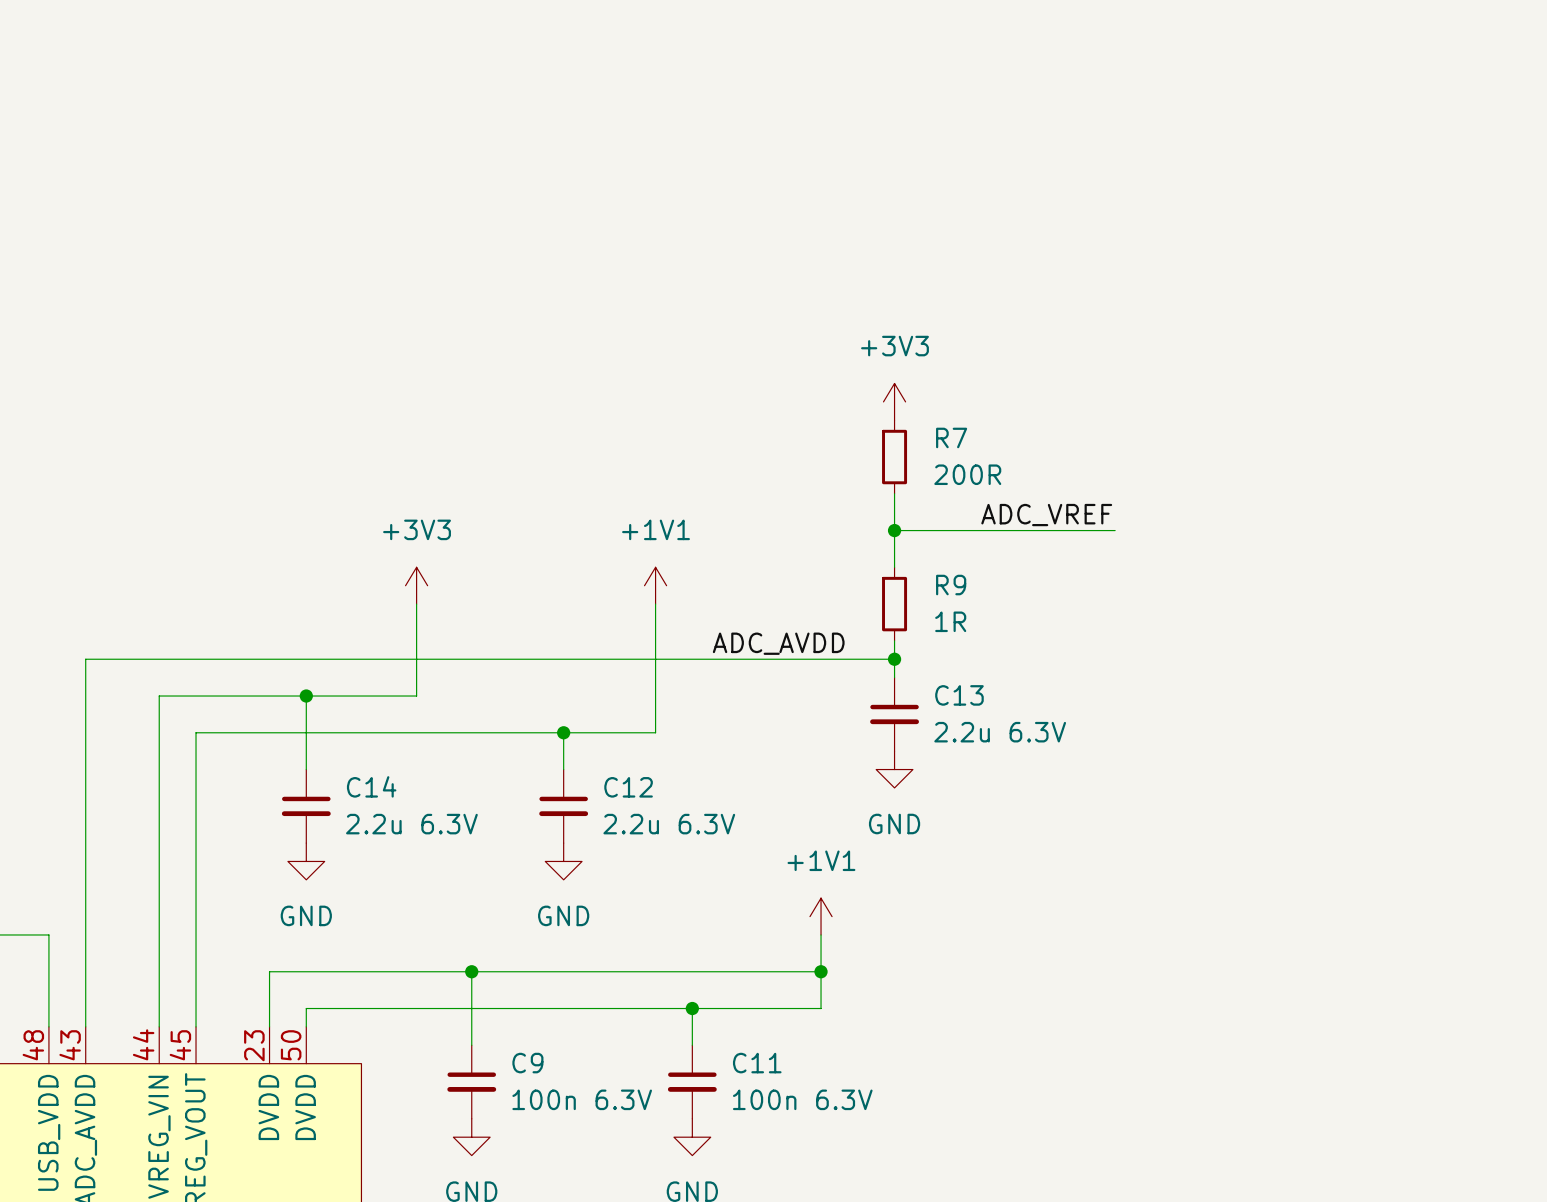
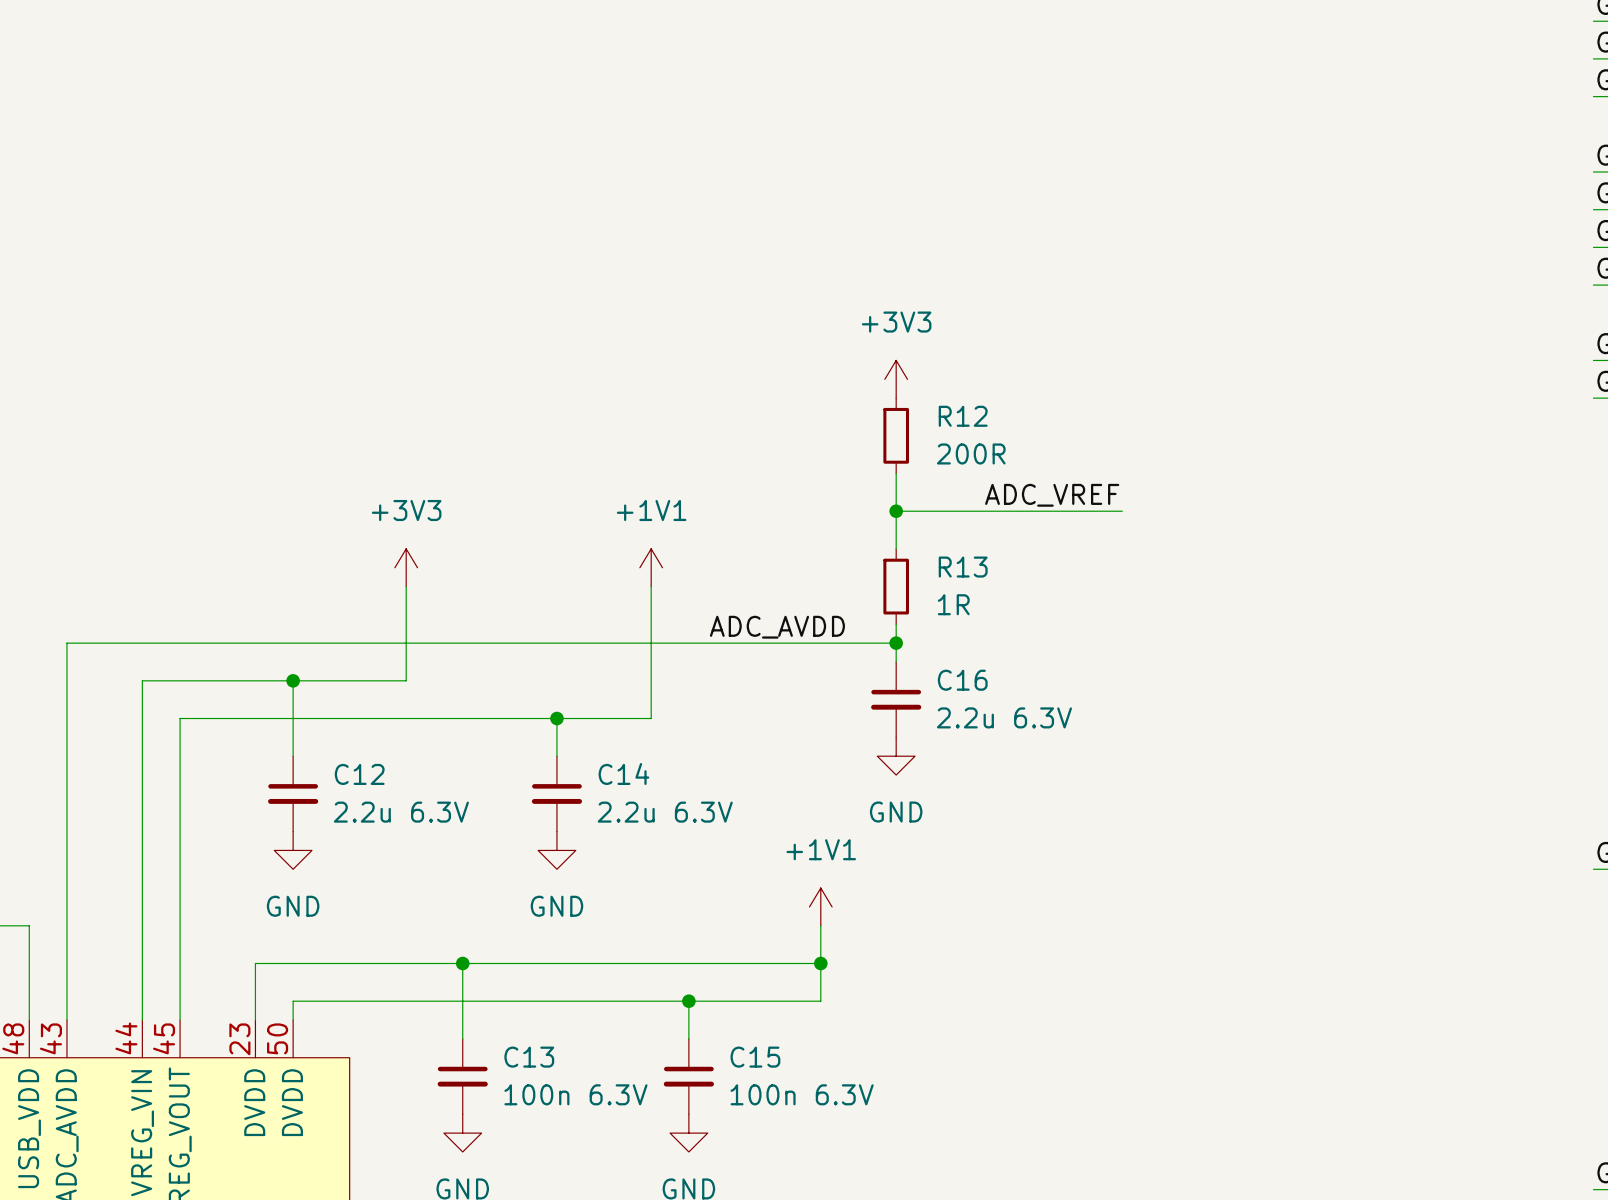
R7 name: R7 (951, 437) -> R12 (963, 416)
R9 name: R9 (951, 585) -> R13 (963, 567)
C13 name: C13 (959, 695) -> C16 (962, 680)
C14 name: C14 (371, 786) -> C12 (359, 774)
C12 name: C12 (628, 787) -> C14 (623, 773)
C9 name: C9 (527, 1063) -> C13 (529, 1057)
C11 name: C11 (757, 1063) -> C15 (755, 1057)

